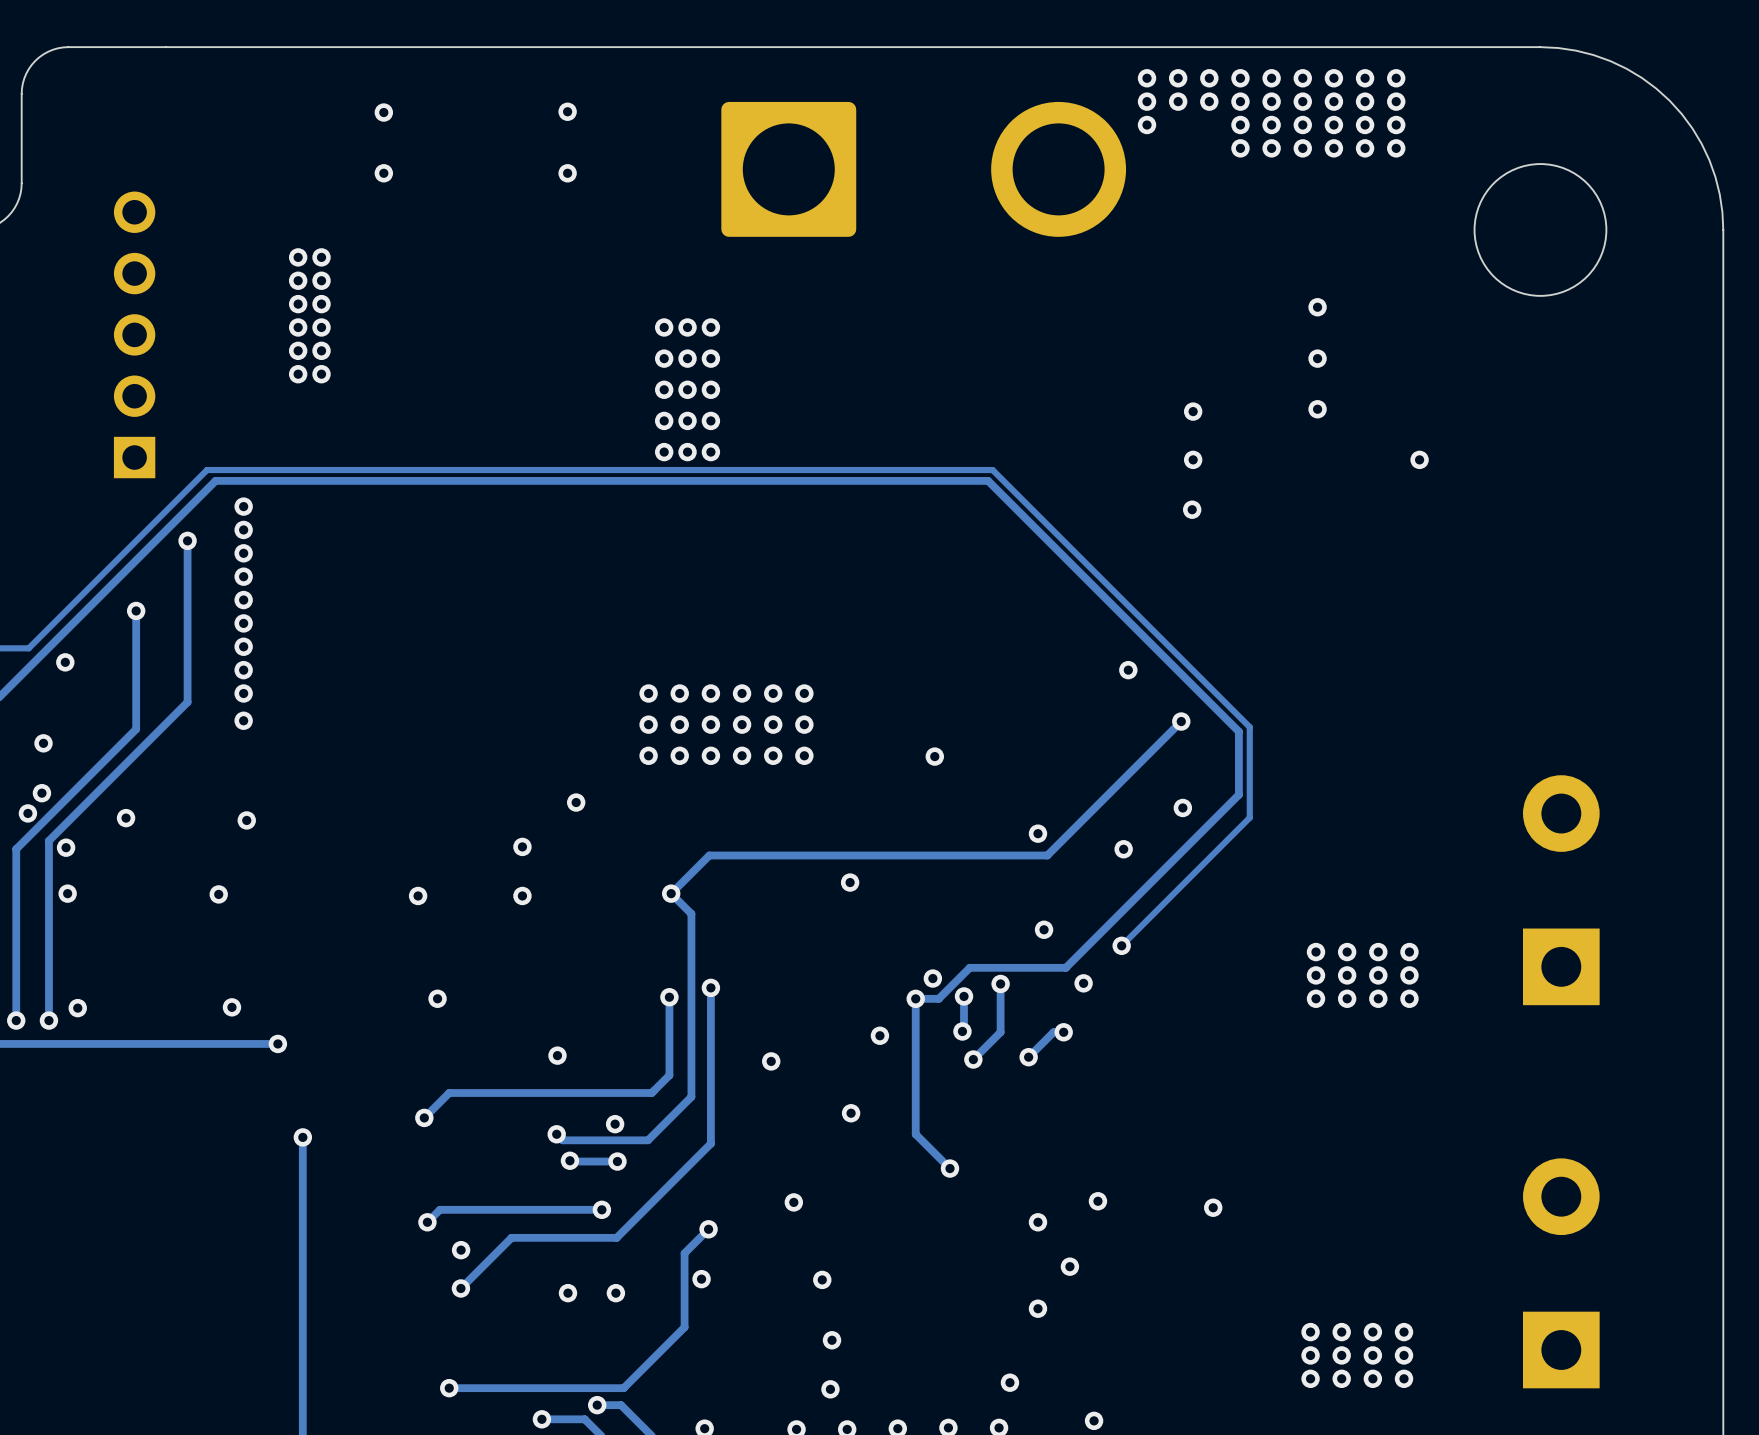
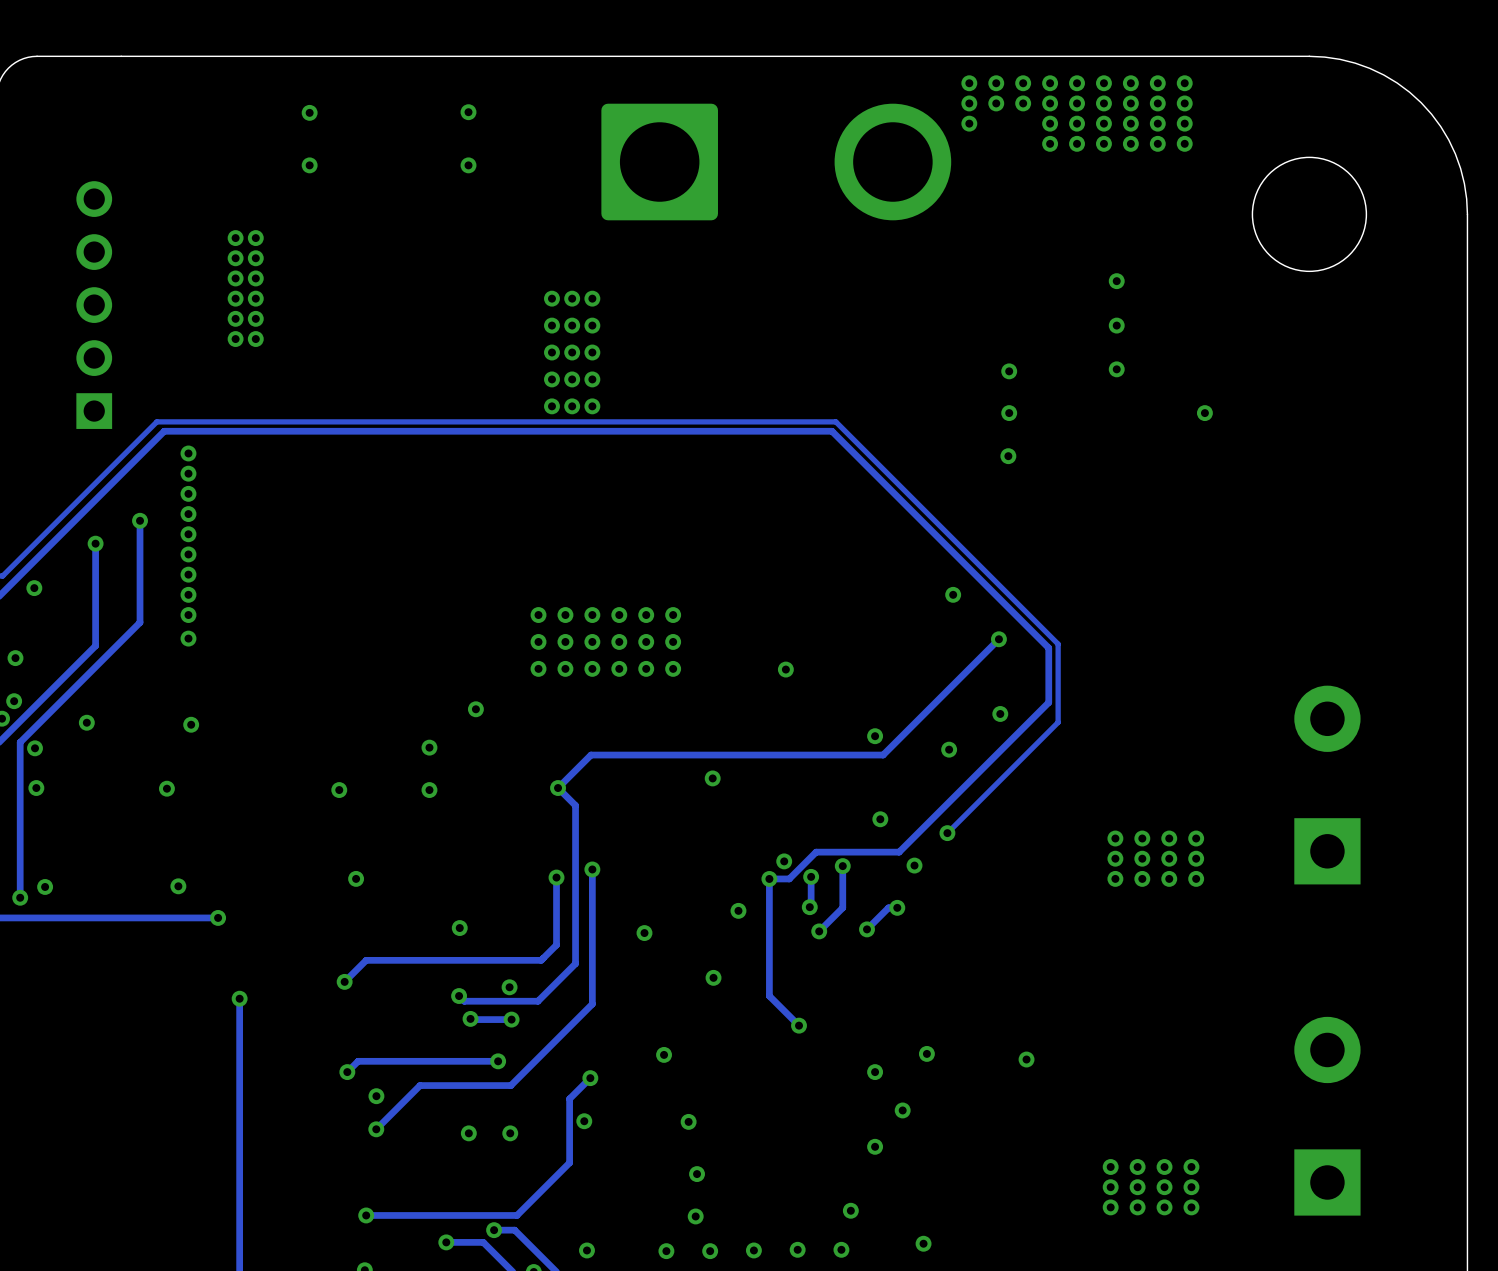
track: (187, 540) (187, 584) -> none
via position: (187, 540) -> (140, 520)

